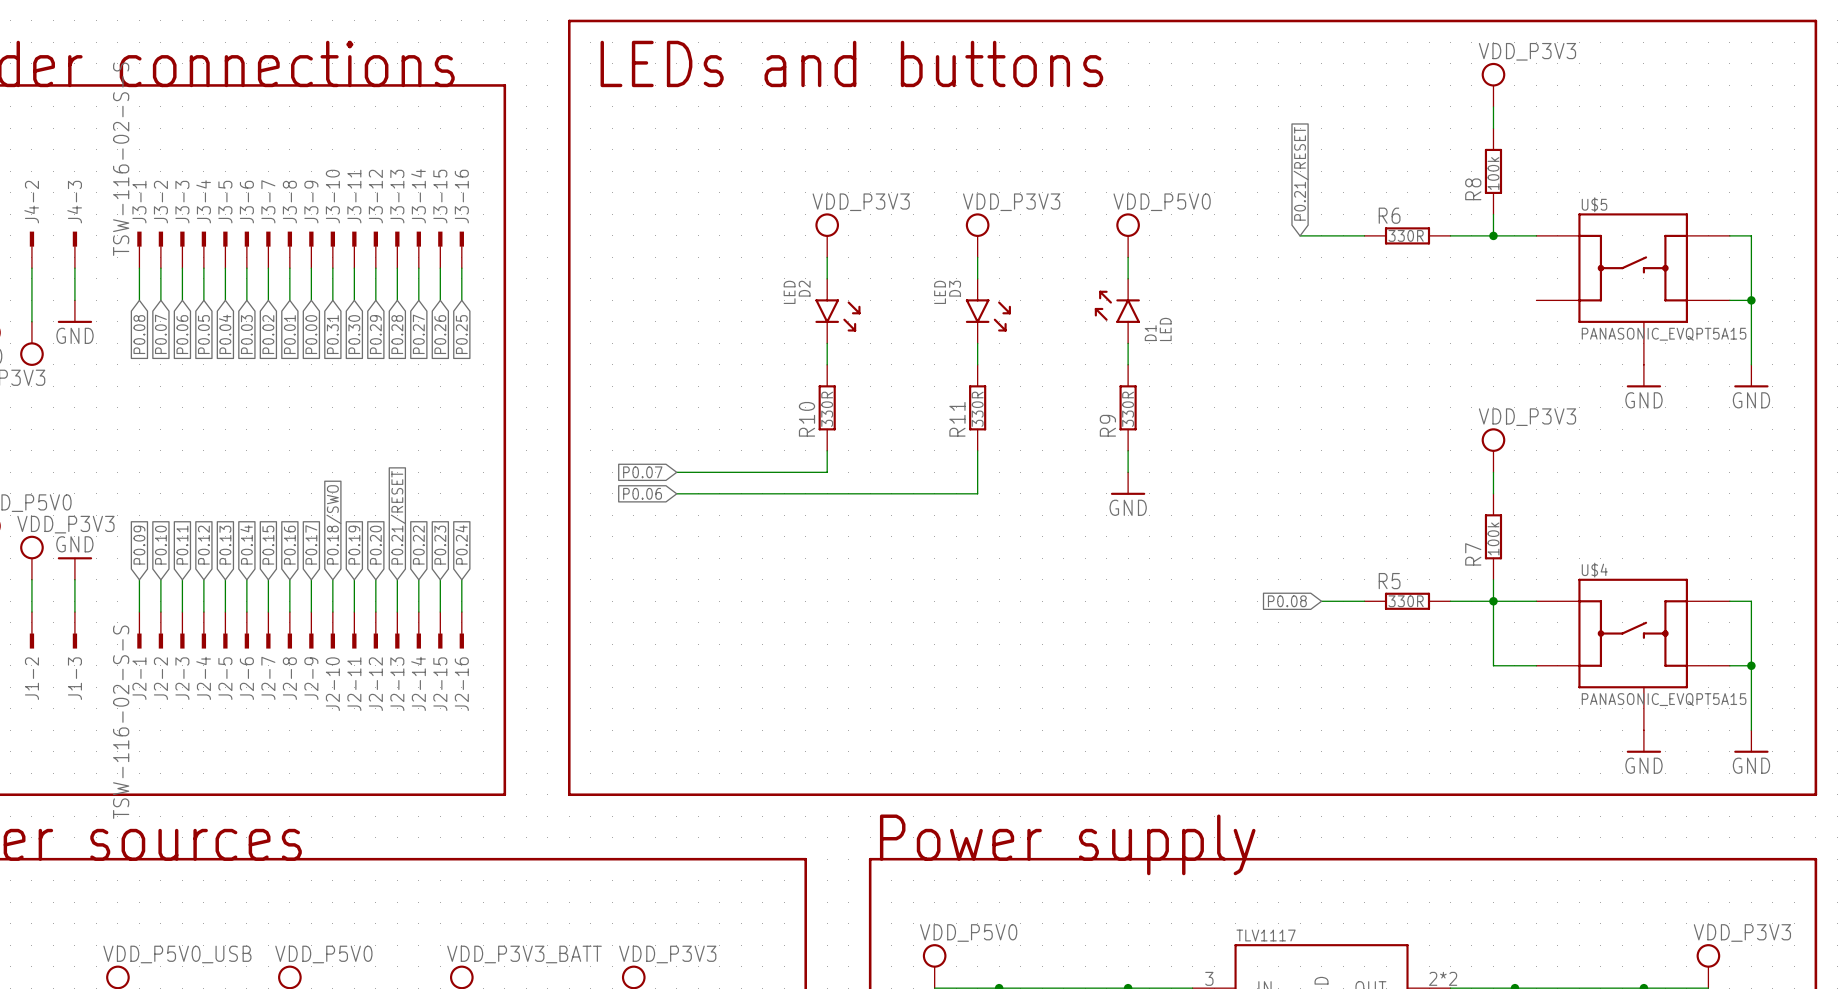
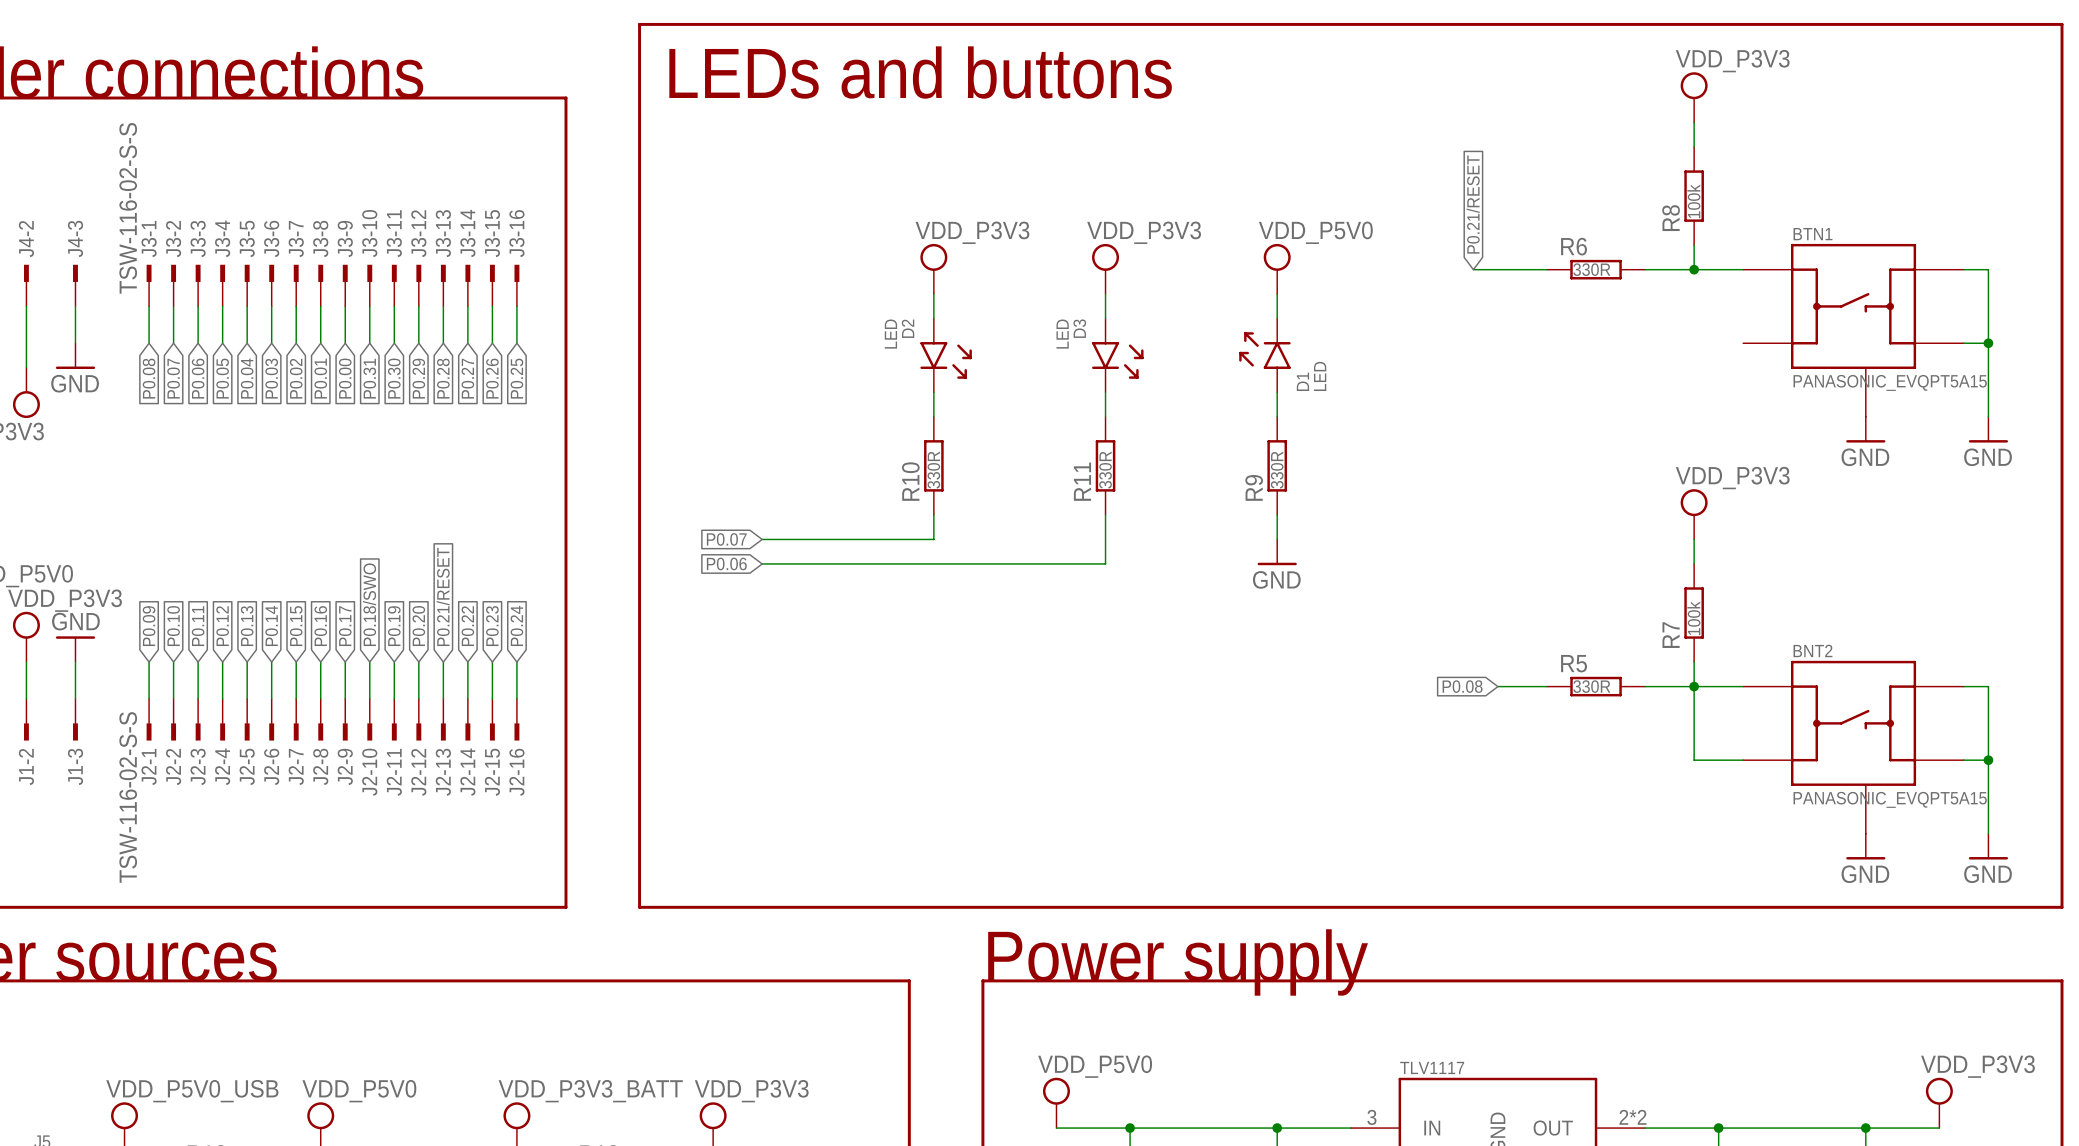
U$5 name: U$5 (1594, 204) -> BTN1 (1813, 234)
U$4 name: U$4 (1594, 570) -> BNT2 (1812, 650)

